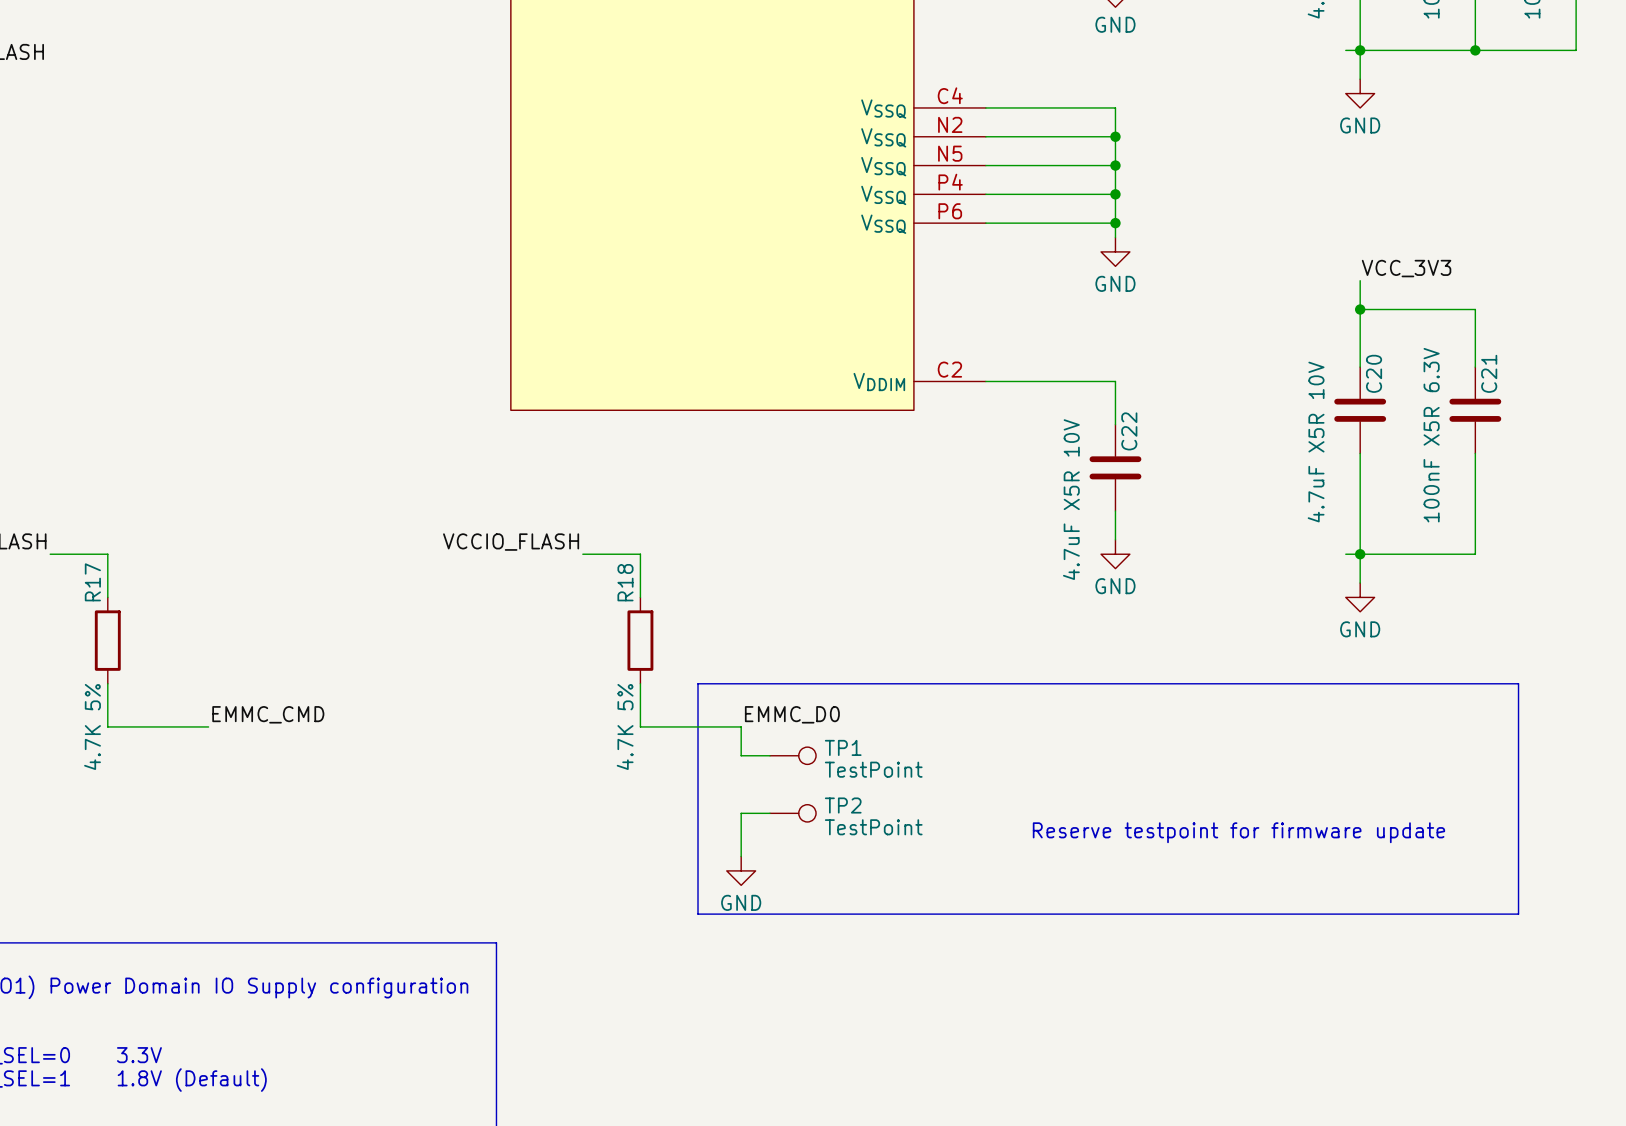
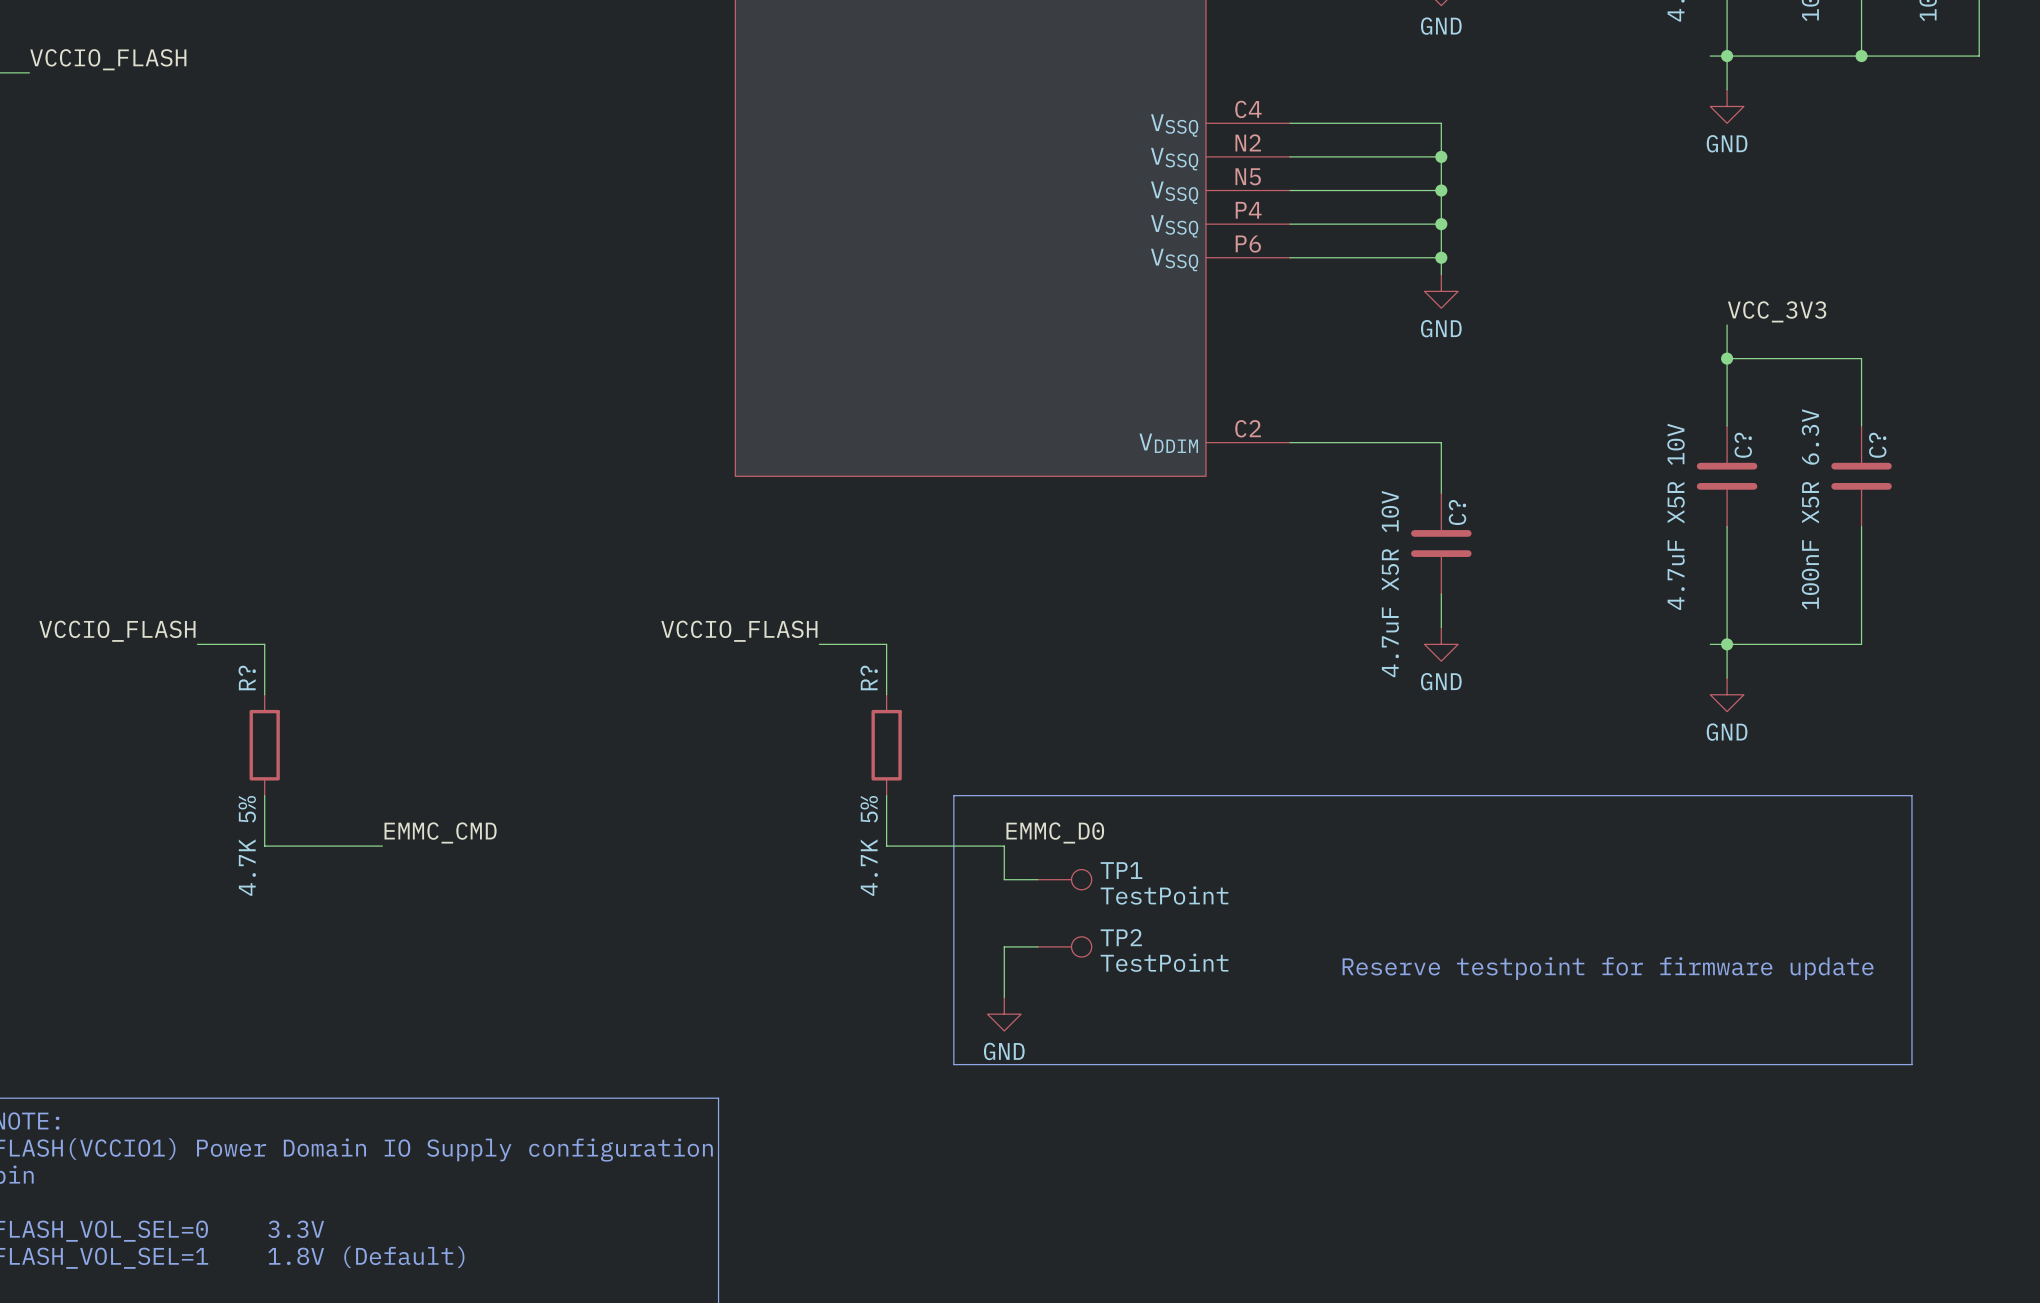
C20 name: C20 (1374, 373) -> C? (1743, 445)
C21 name: C21 (1489, 373) -> C? (1877, 445)
C22 name: C22 (1129, 431) -> C? (1457, 512)
R17 name: R17 (92, 582) -> R? (247, 677)
R18 name: R18 (625, 582) -> R? (869, 677)

